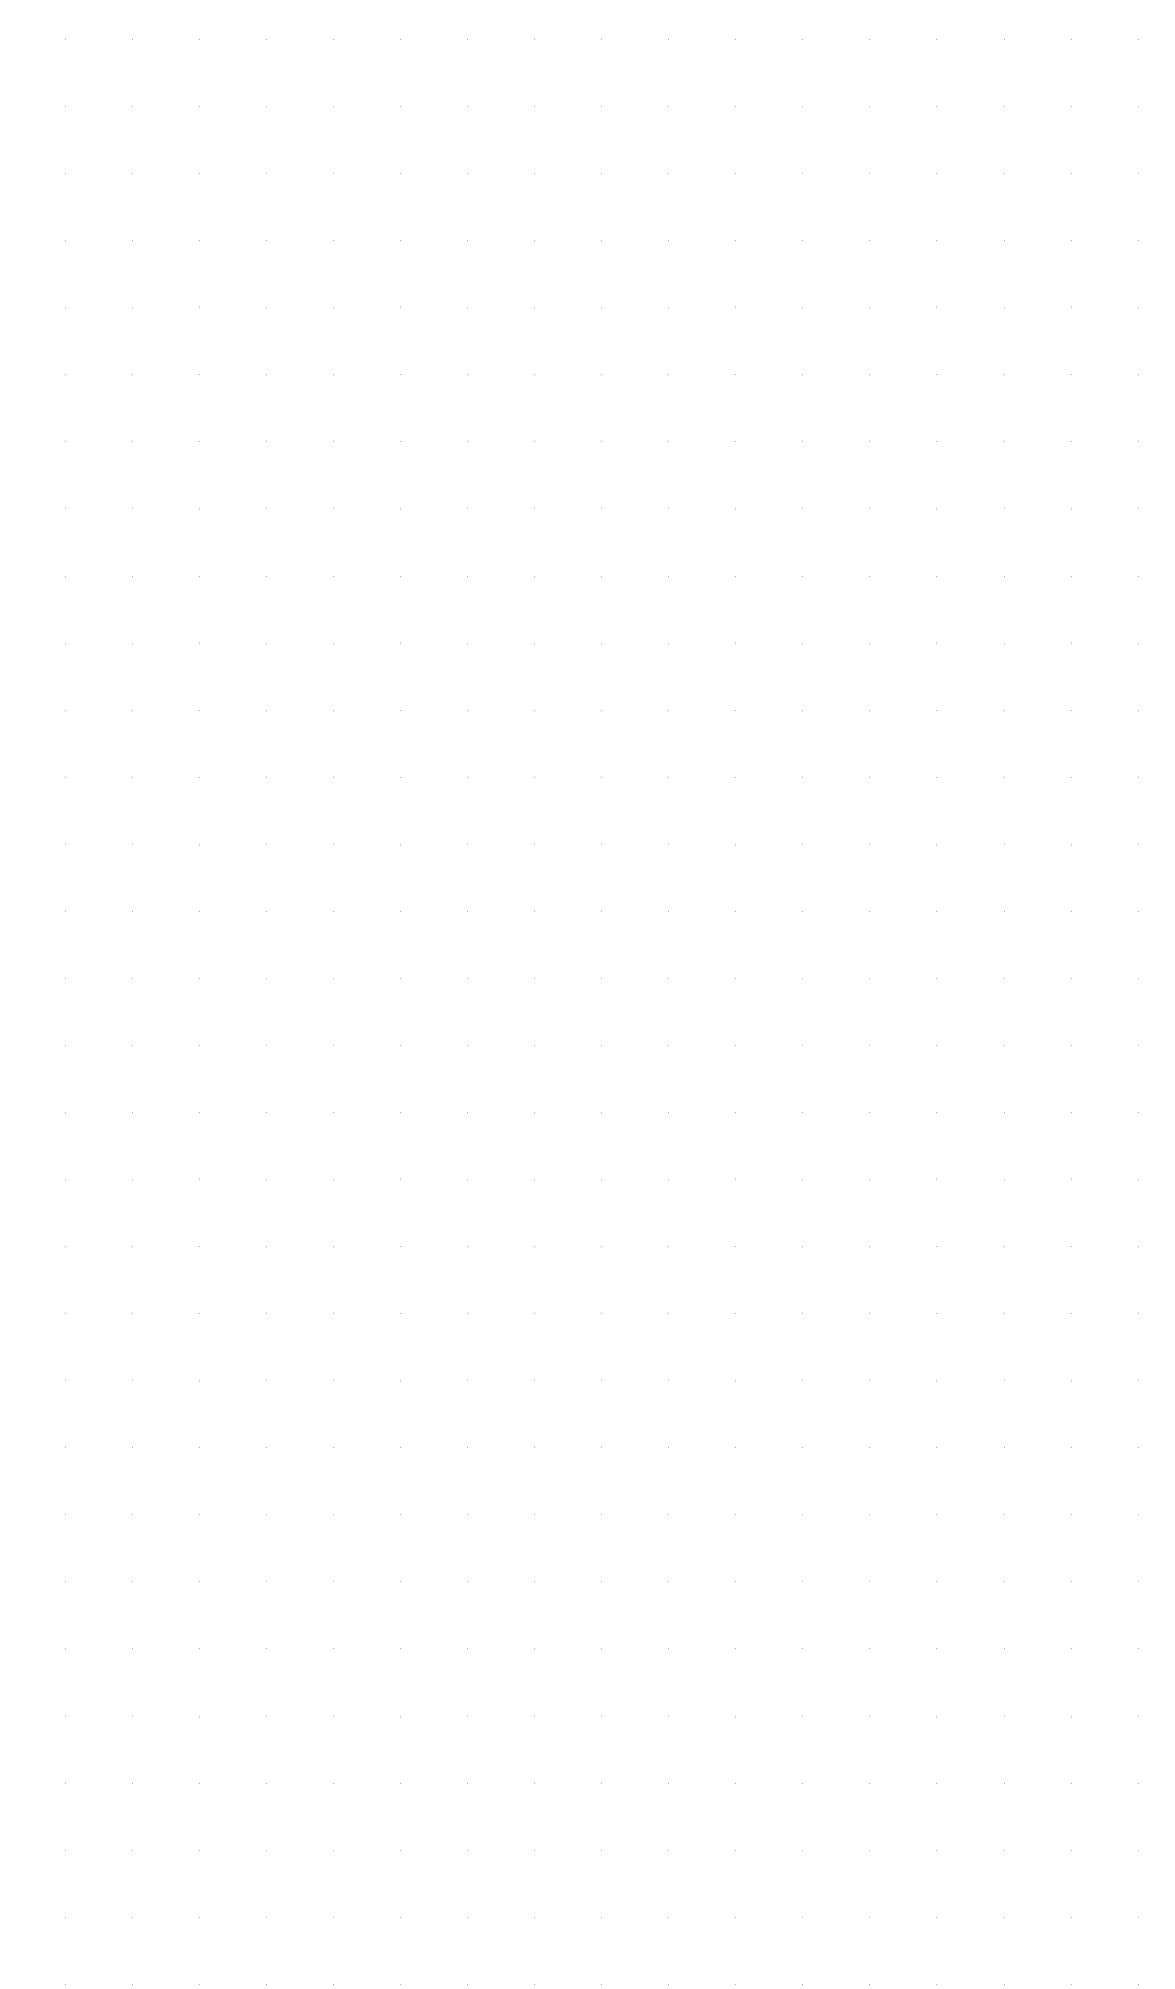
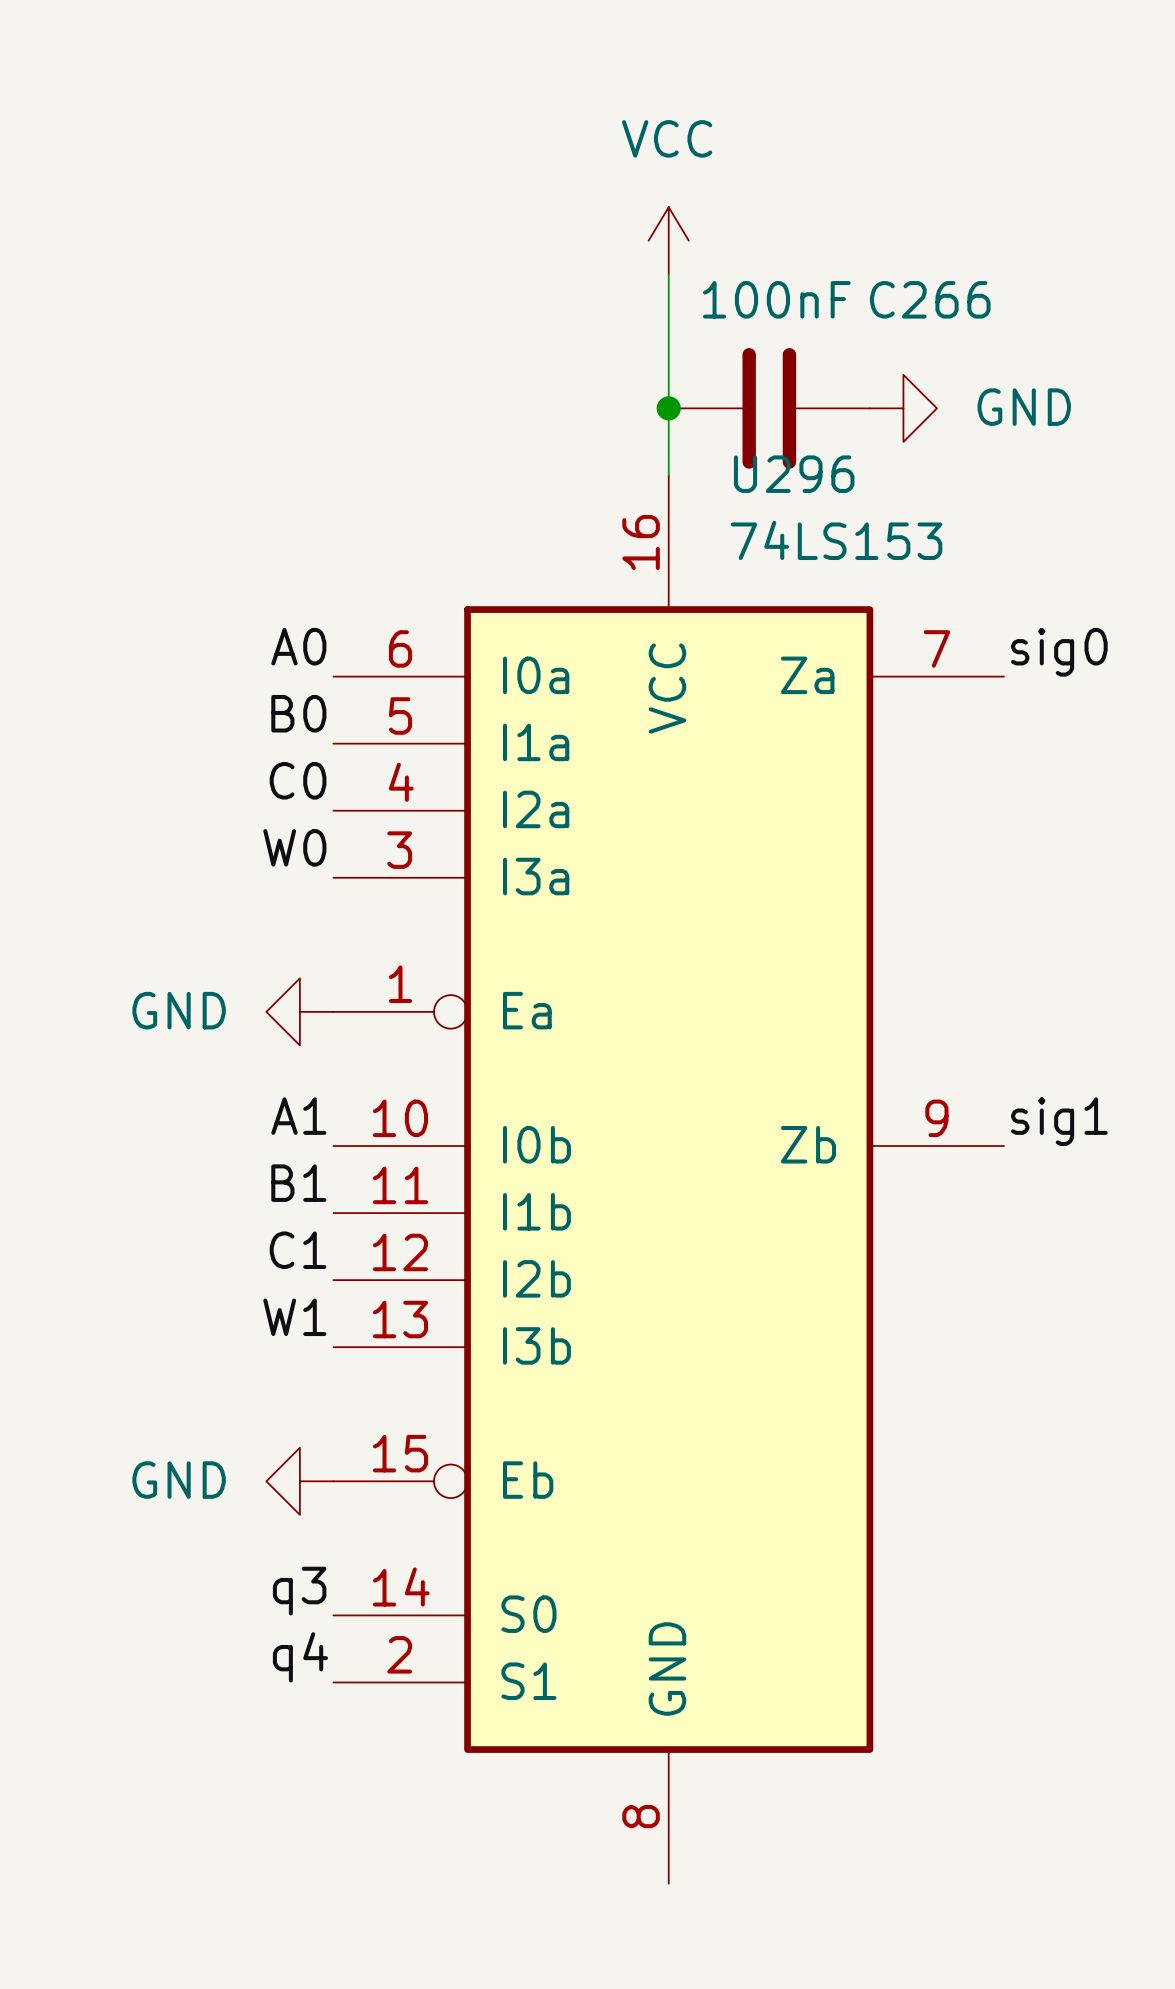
power symbol: none -> VCC (668, 240)
wire: none -> (668, 274) (668, 475)
junction: none -> (668, 408)
C266: none -> 100nF (769, 408)
power symbol: none -> GND (903, 408)
label: none -> A0 (298, 646)
label: none -> sig0 (1059, 652)
label: none -> B0 (298, 713)
label: none -> C0 (298, 780)
label: none -> W0 (294, 847)
power symbol: none -> GND (299, 1011)
label: none -> A1 (298, 1116)
label: none -> sig1 (1059, 1121)
U296: none -> 74LS153 (668, 1179)
label: none -> B1 (298, 1183)
label: none -> C1 (298, 1250)
label: none -> W1 (294, 1317)
power symbol: none -> GND (299, 1481)
label: none -> q3 (299, 1591)
label: none -> q4 (300, 1657)

